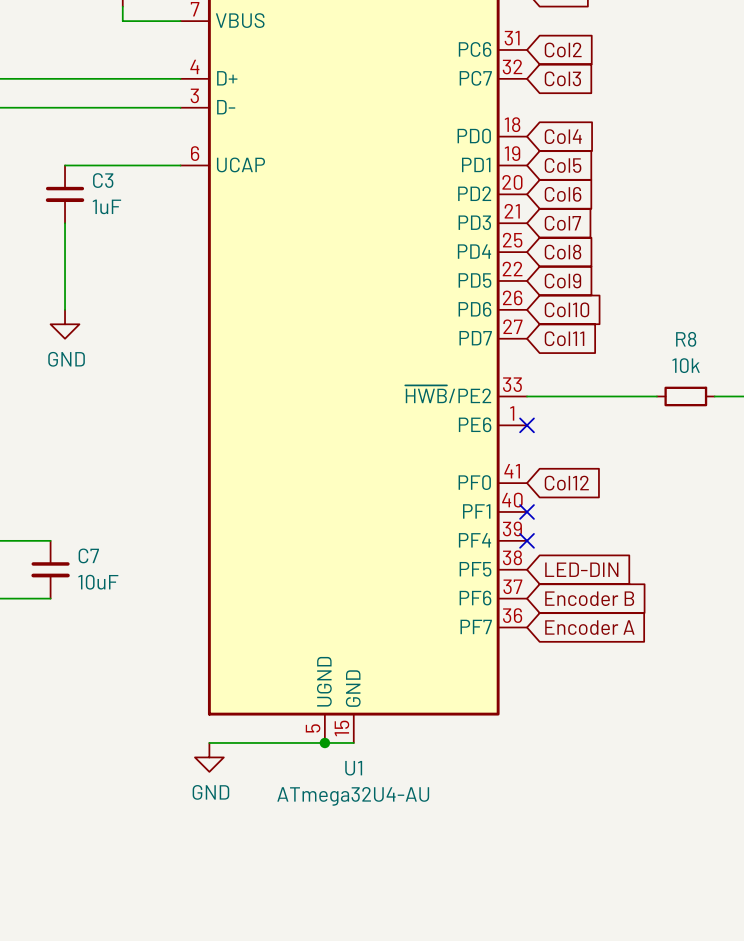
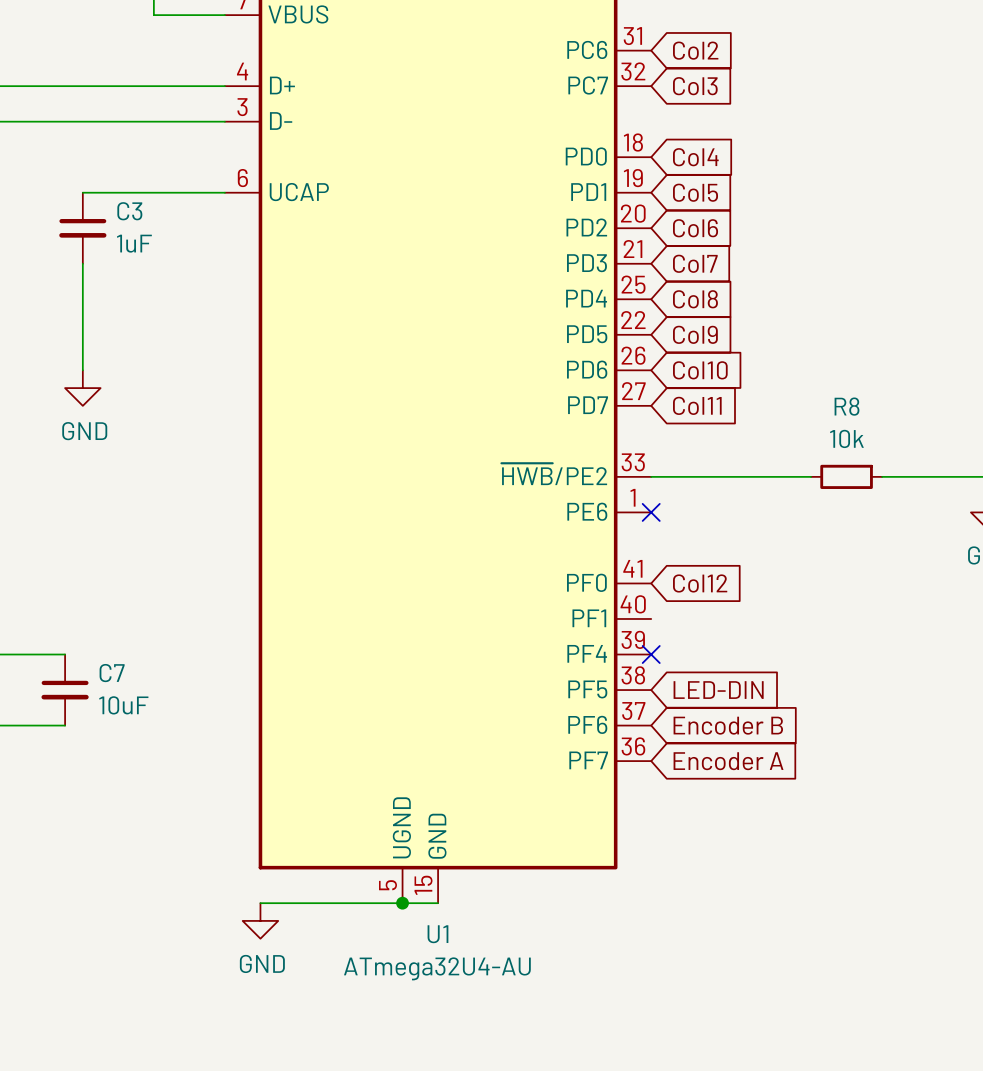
no-connect mark: (527, 511) -> none

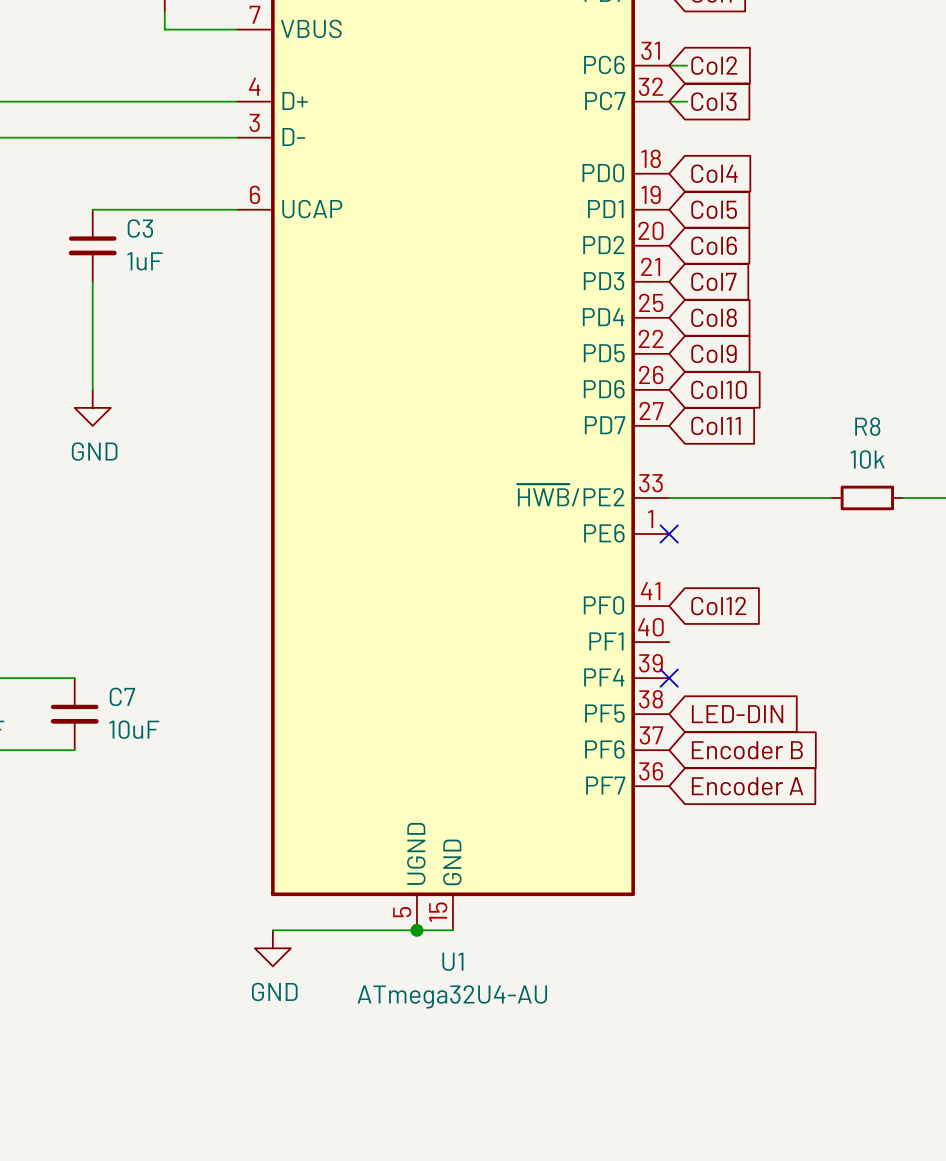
wire: none -> (669, 65) (687, 65)
wire: none -> (669, 101) (687, 101)

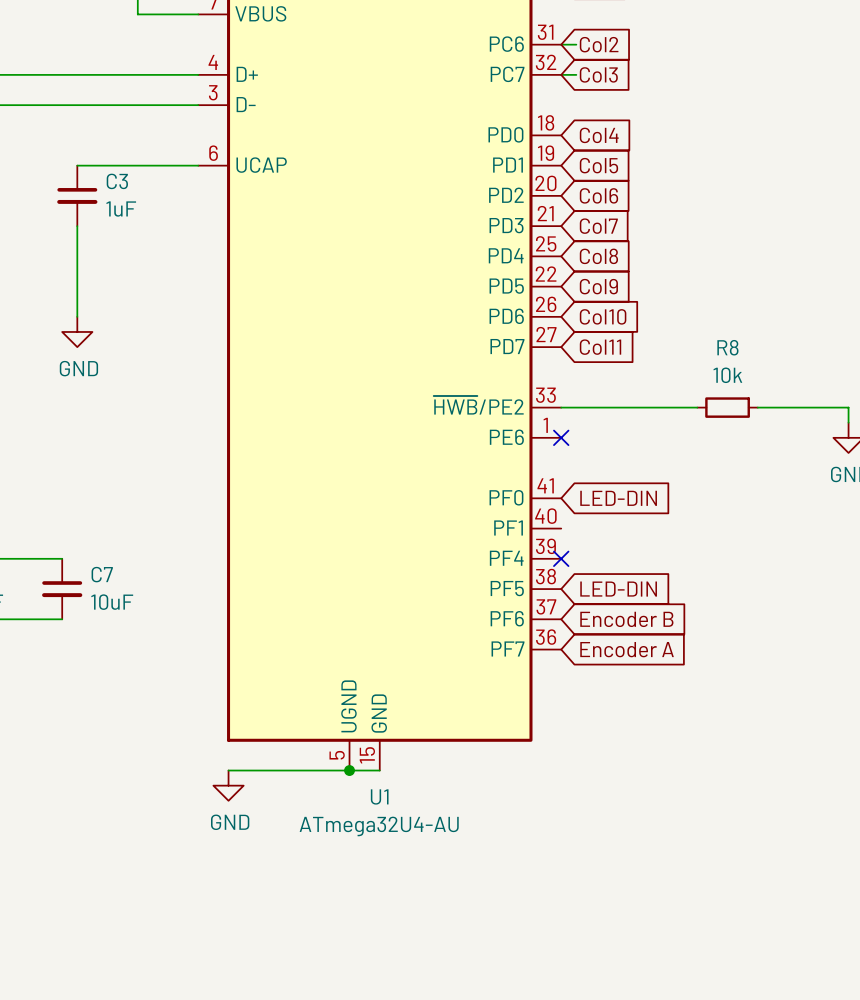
global label: Col12 (718, 606) -> LED-DIN (618, 498)

